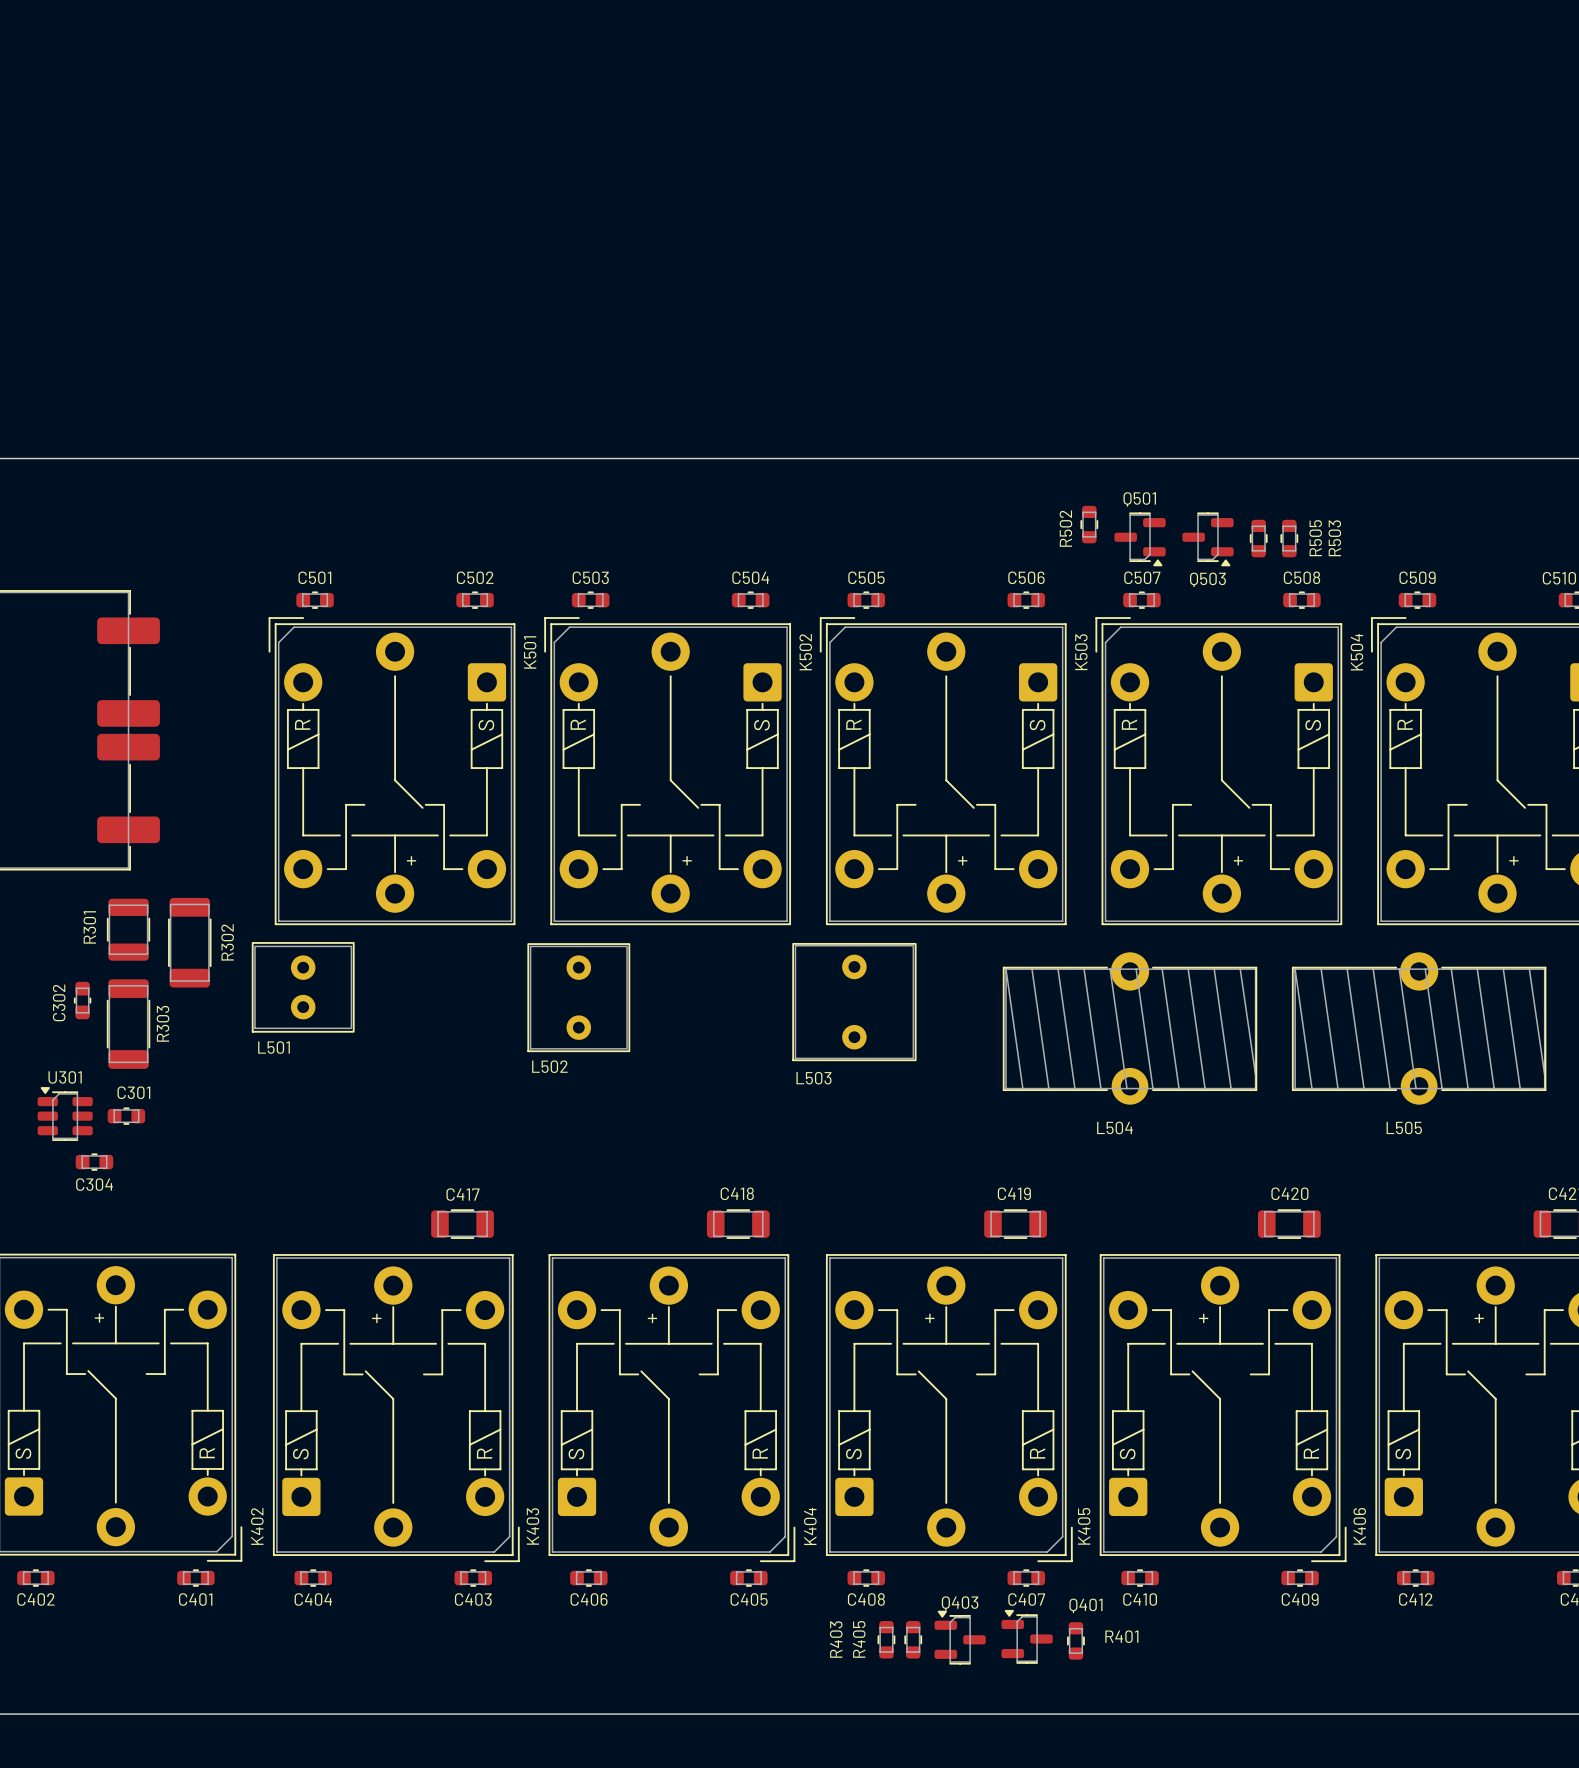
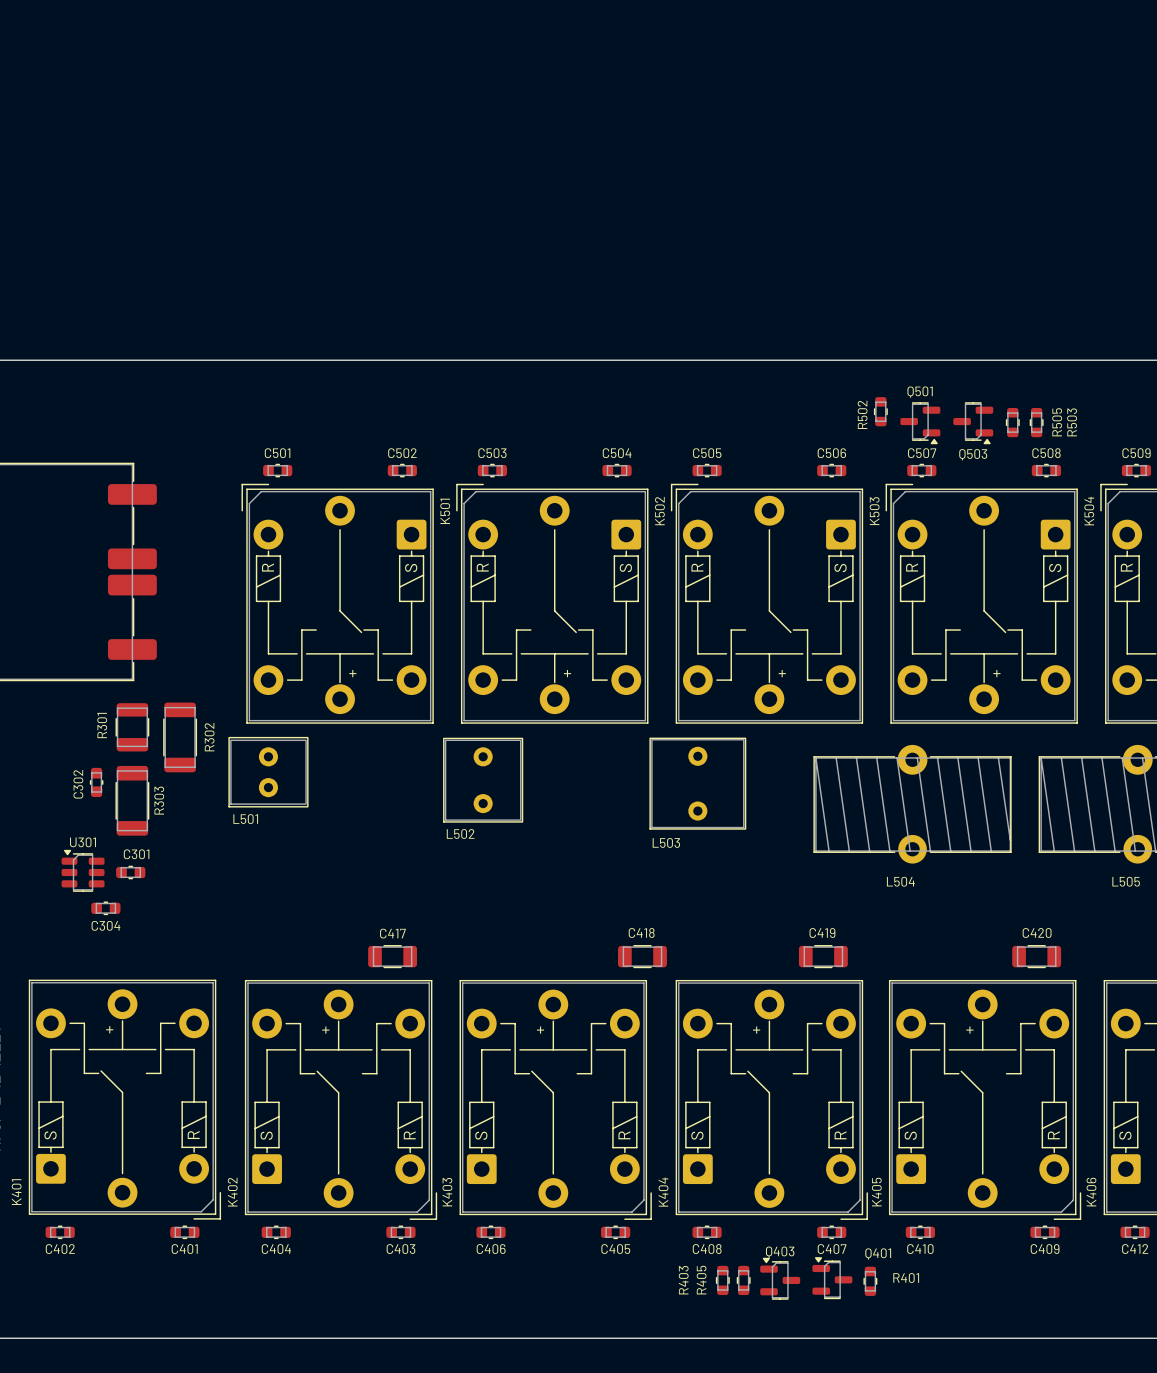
C418 position: (738, 1224) -> (642, 956)

